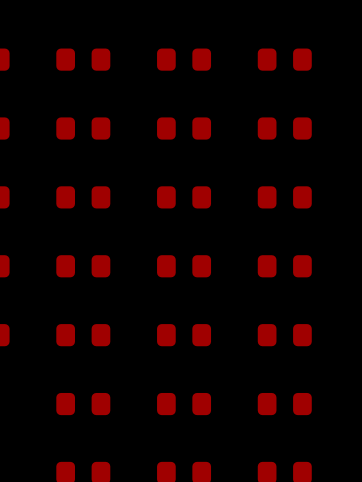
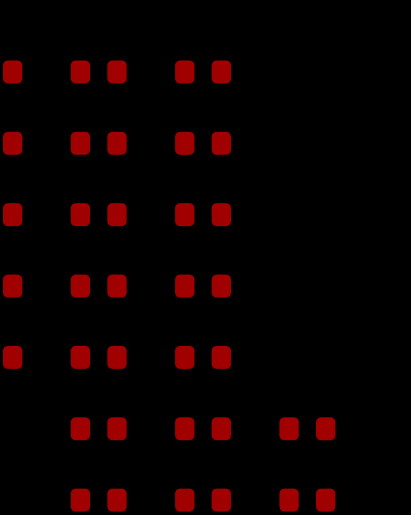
part: (284, 59) -> none
part: (284, 128) -> none
part: (284, 197) -> none
part: (284, 266) -> none
part: (284, 335) -> none

